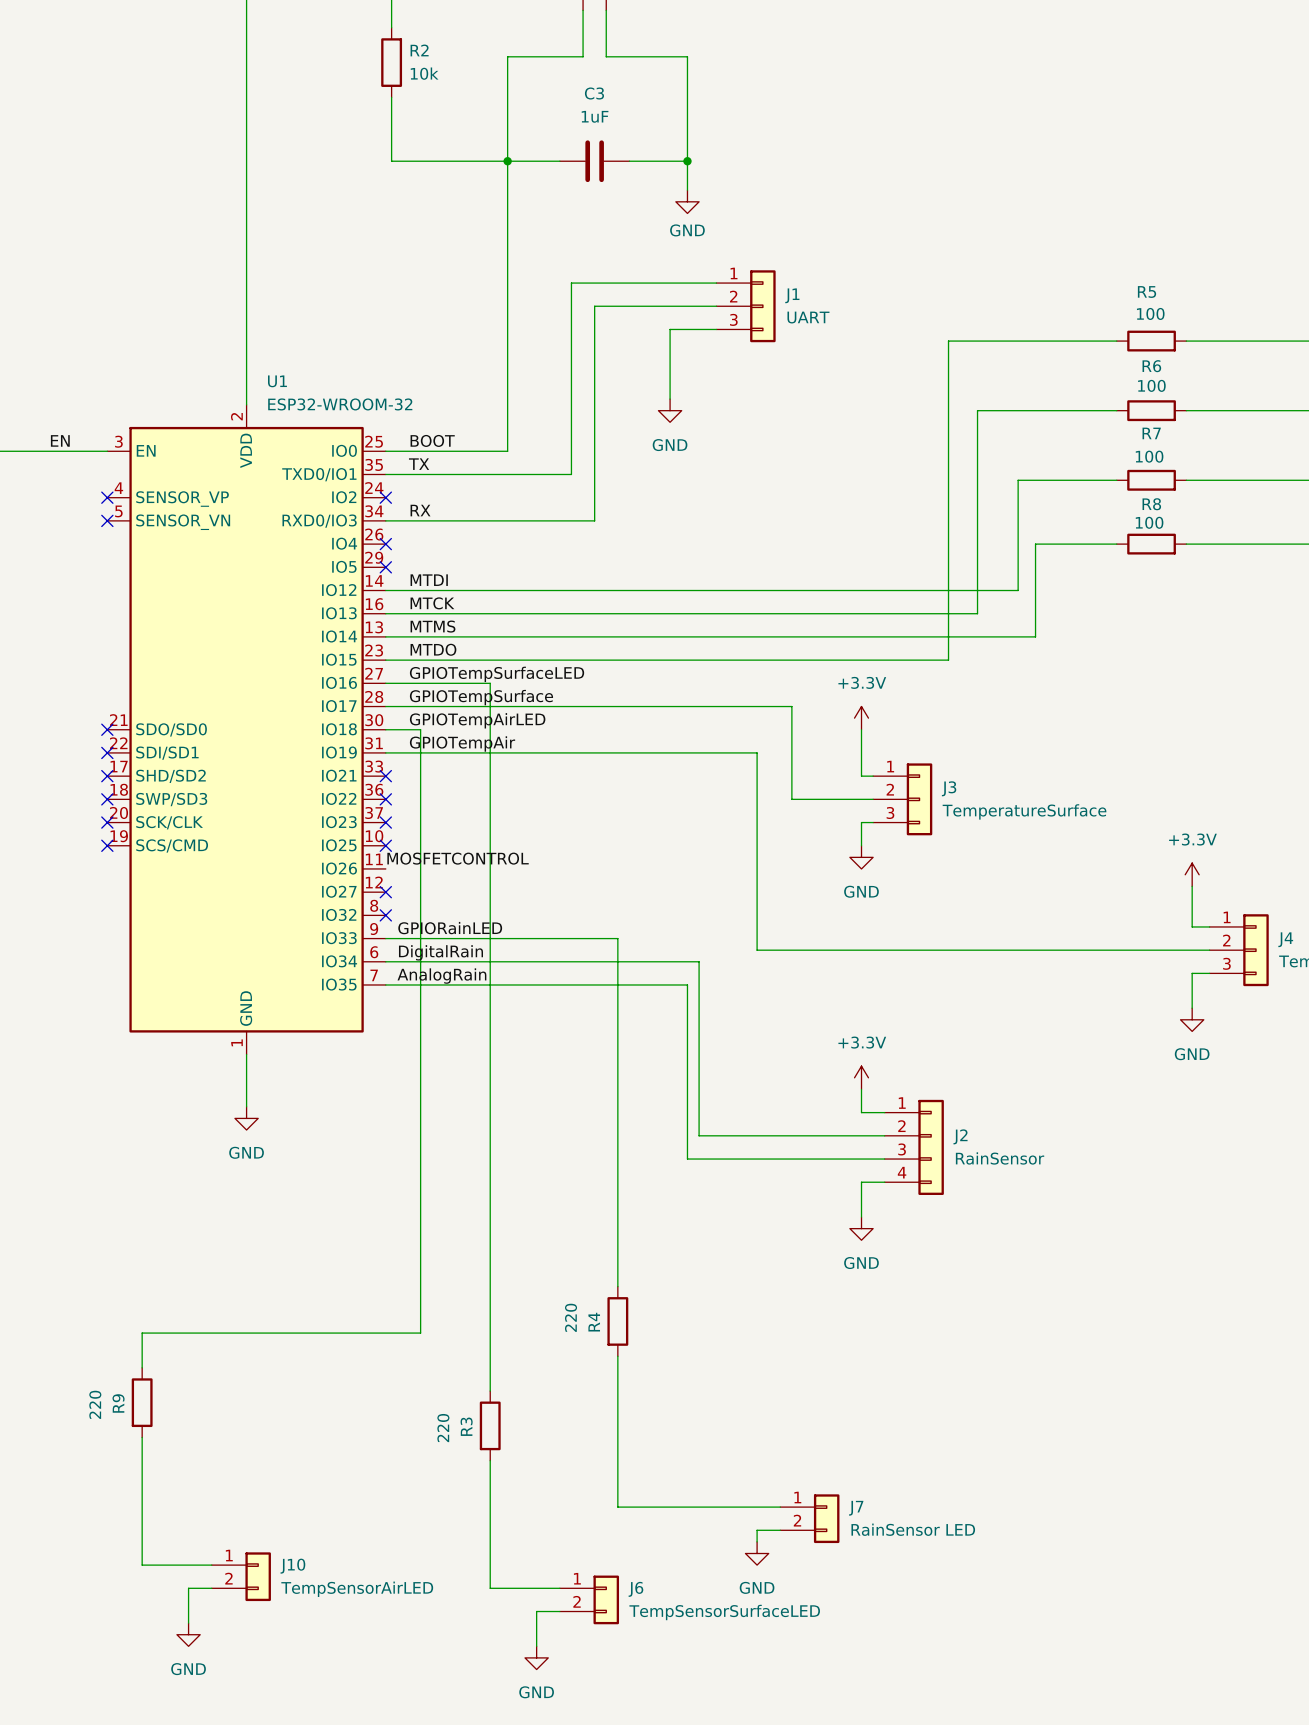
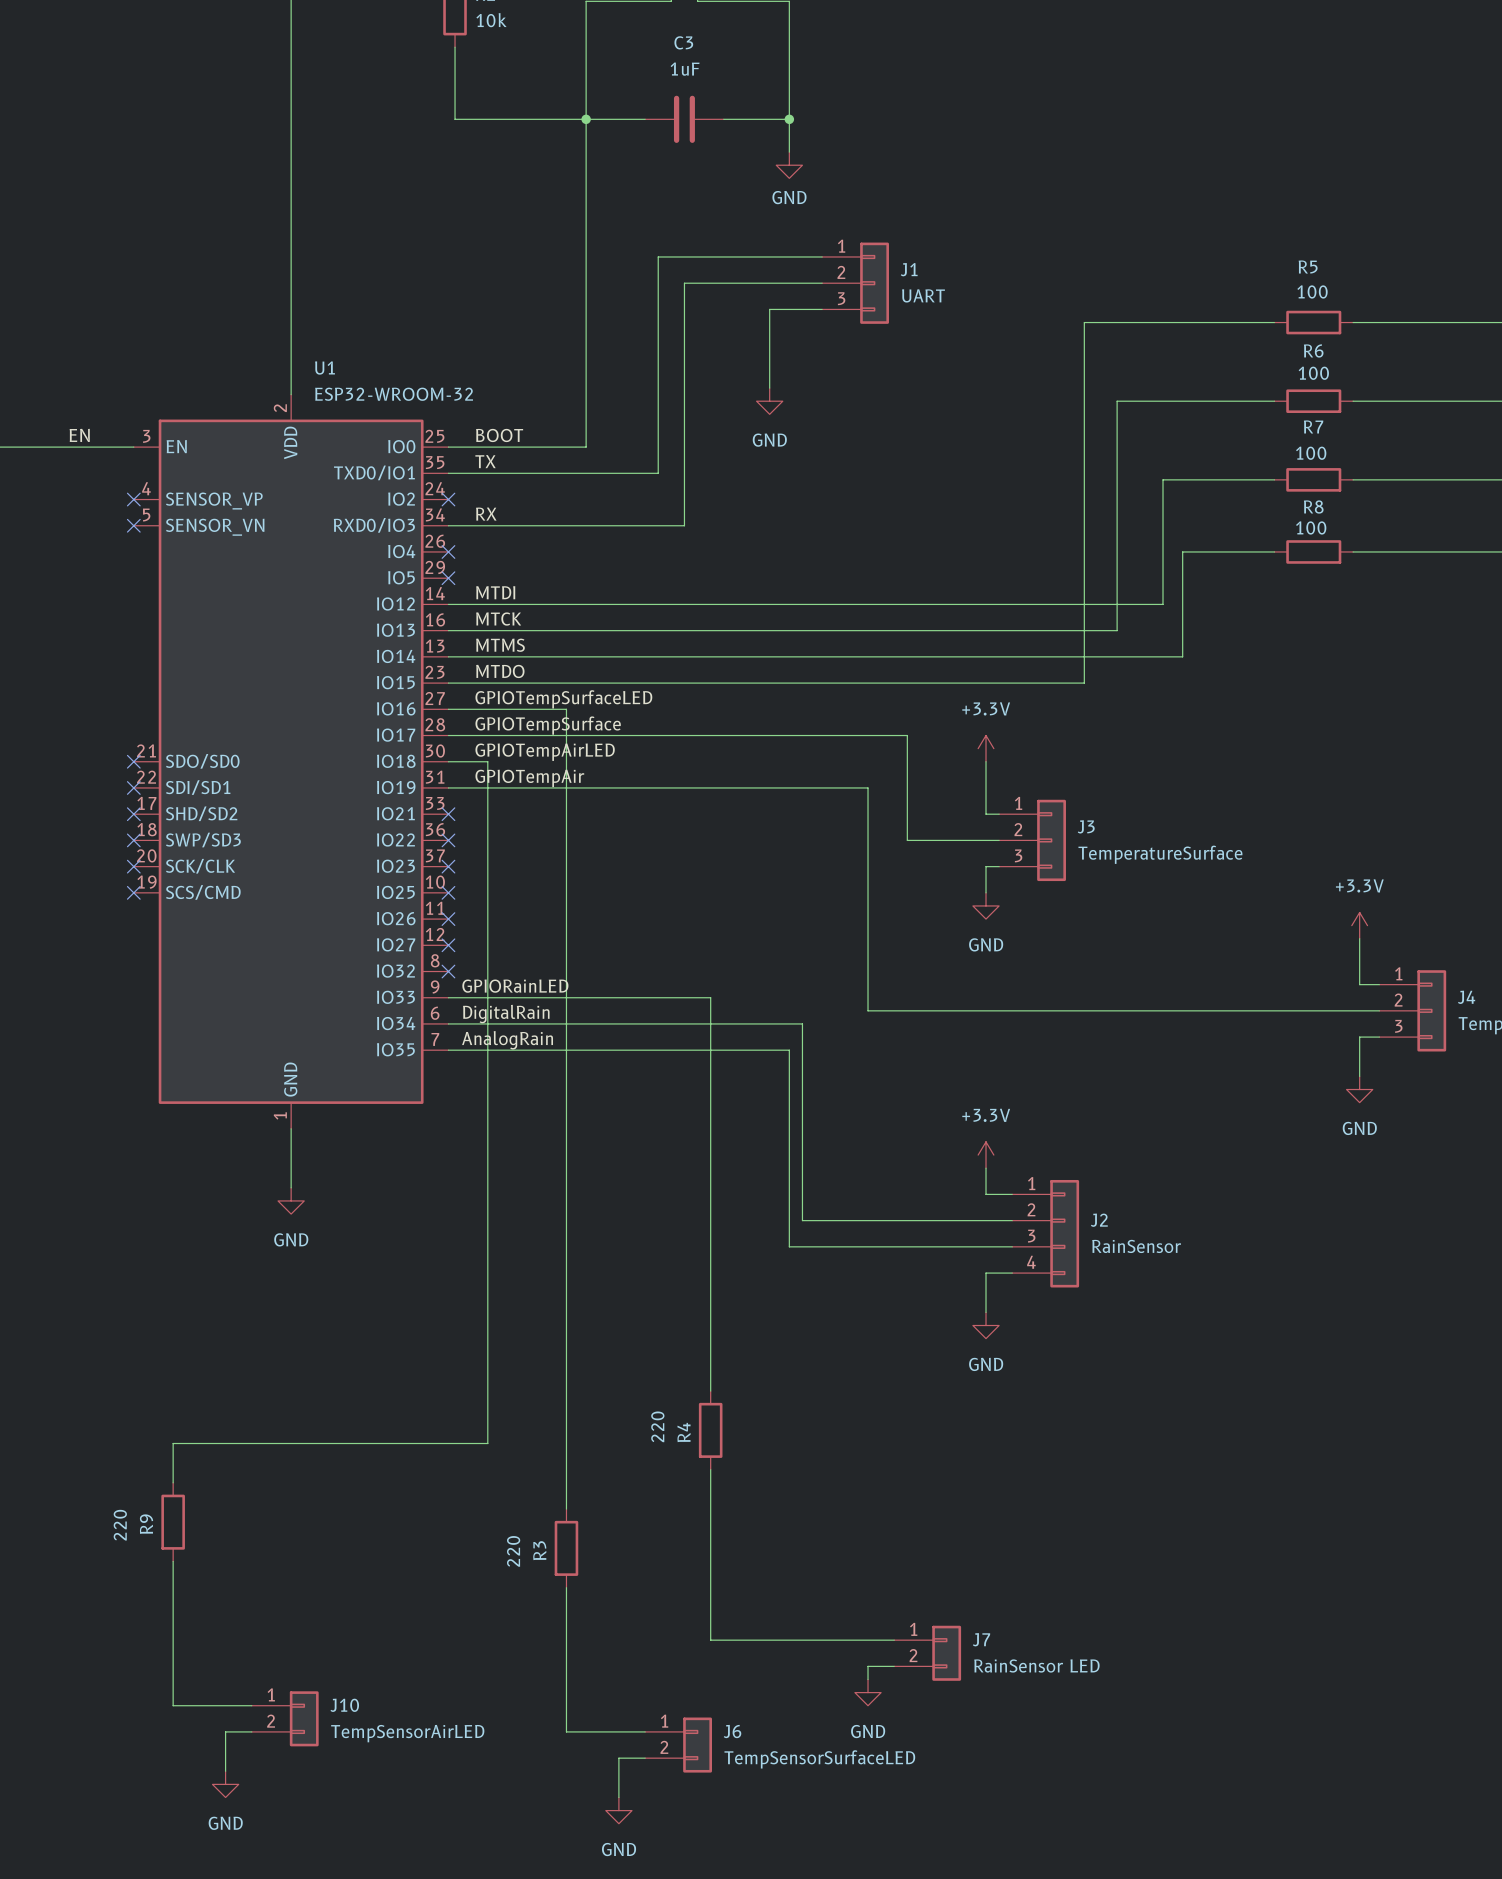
label: MOSFETCONTROL (458, 858) -> none
no-connect mark: none -> (448, 919)

